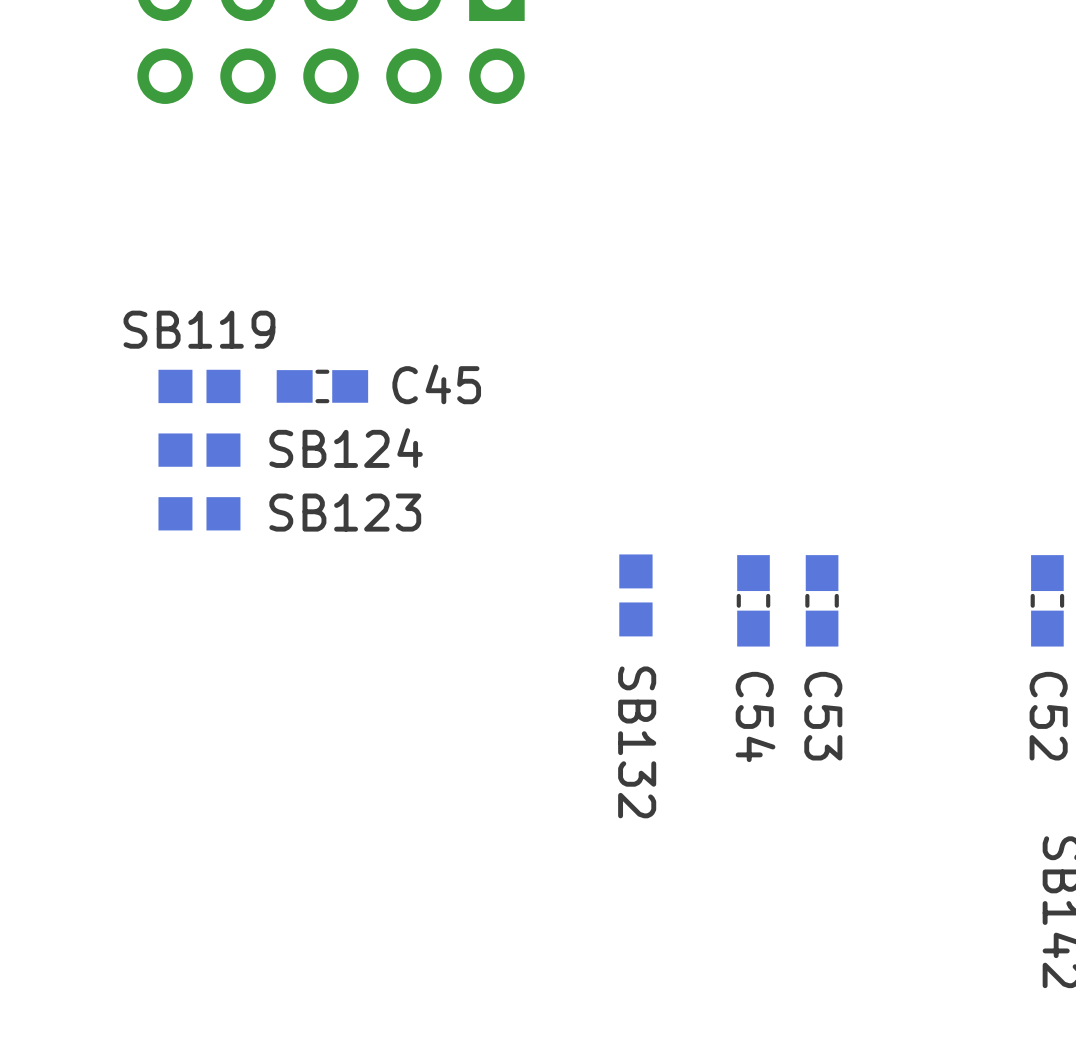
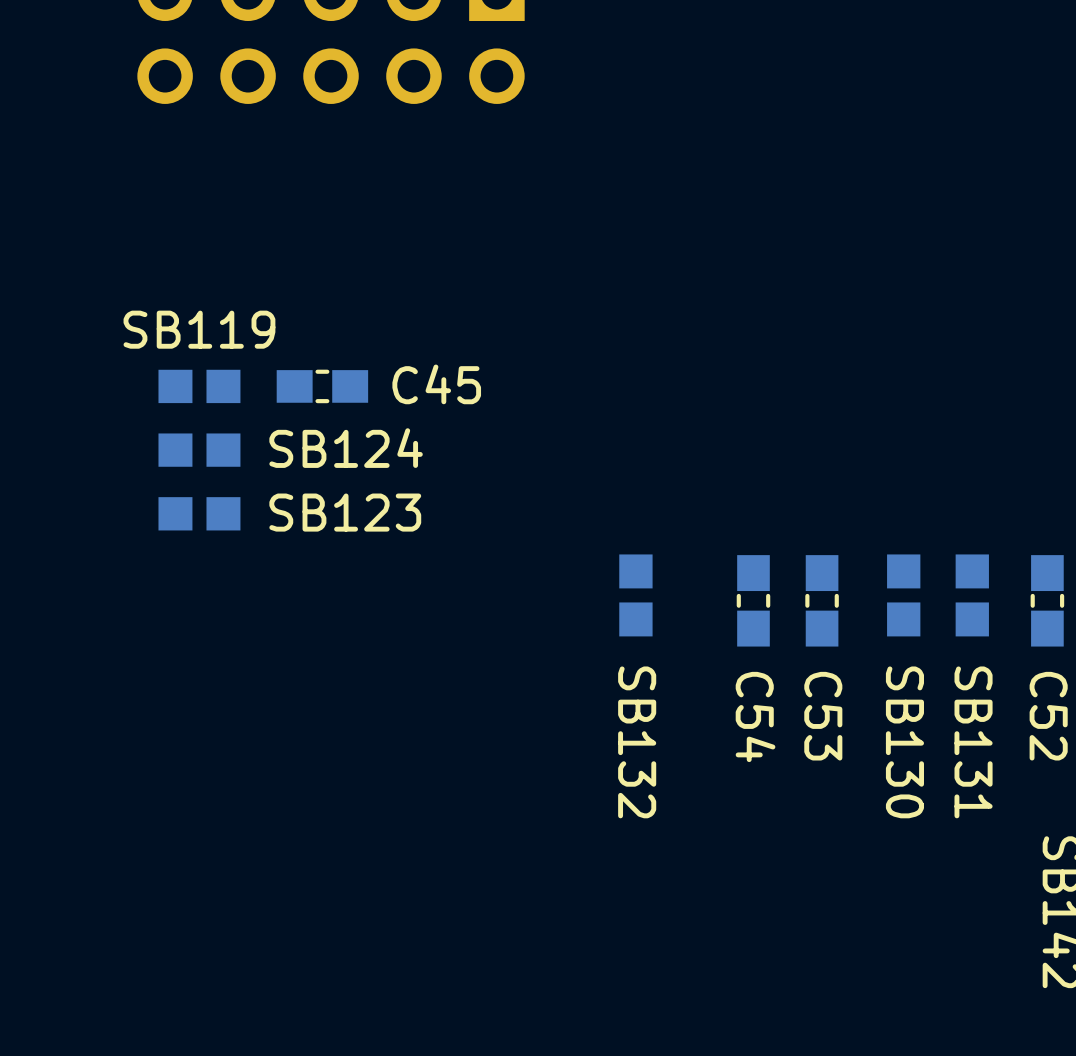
SB130: none -> (903, 595)
SB131: none -> (972, 595)

